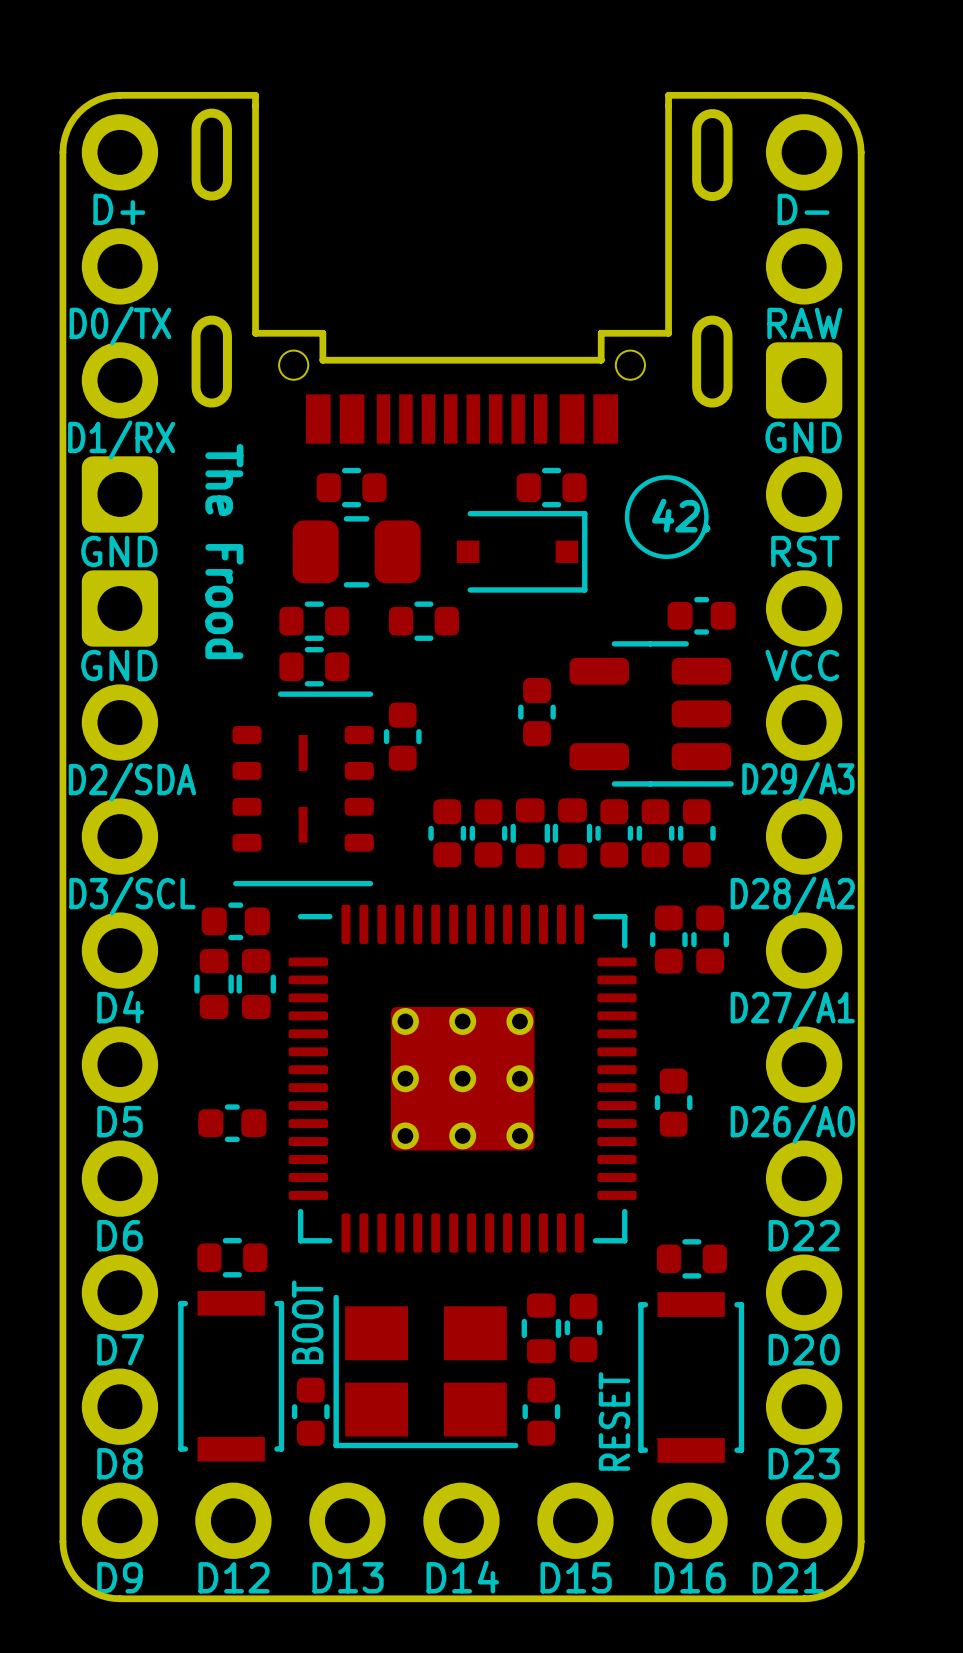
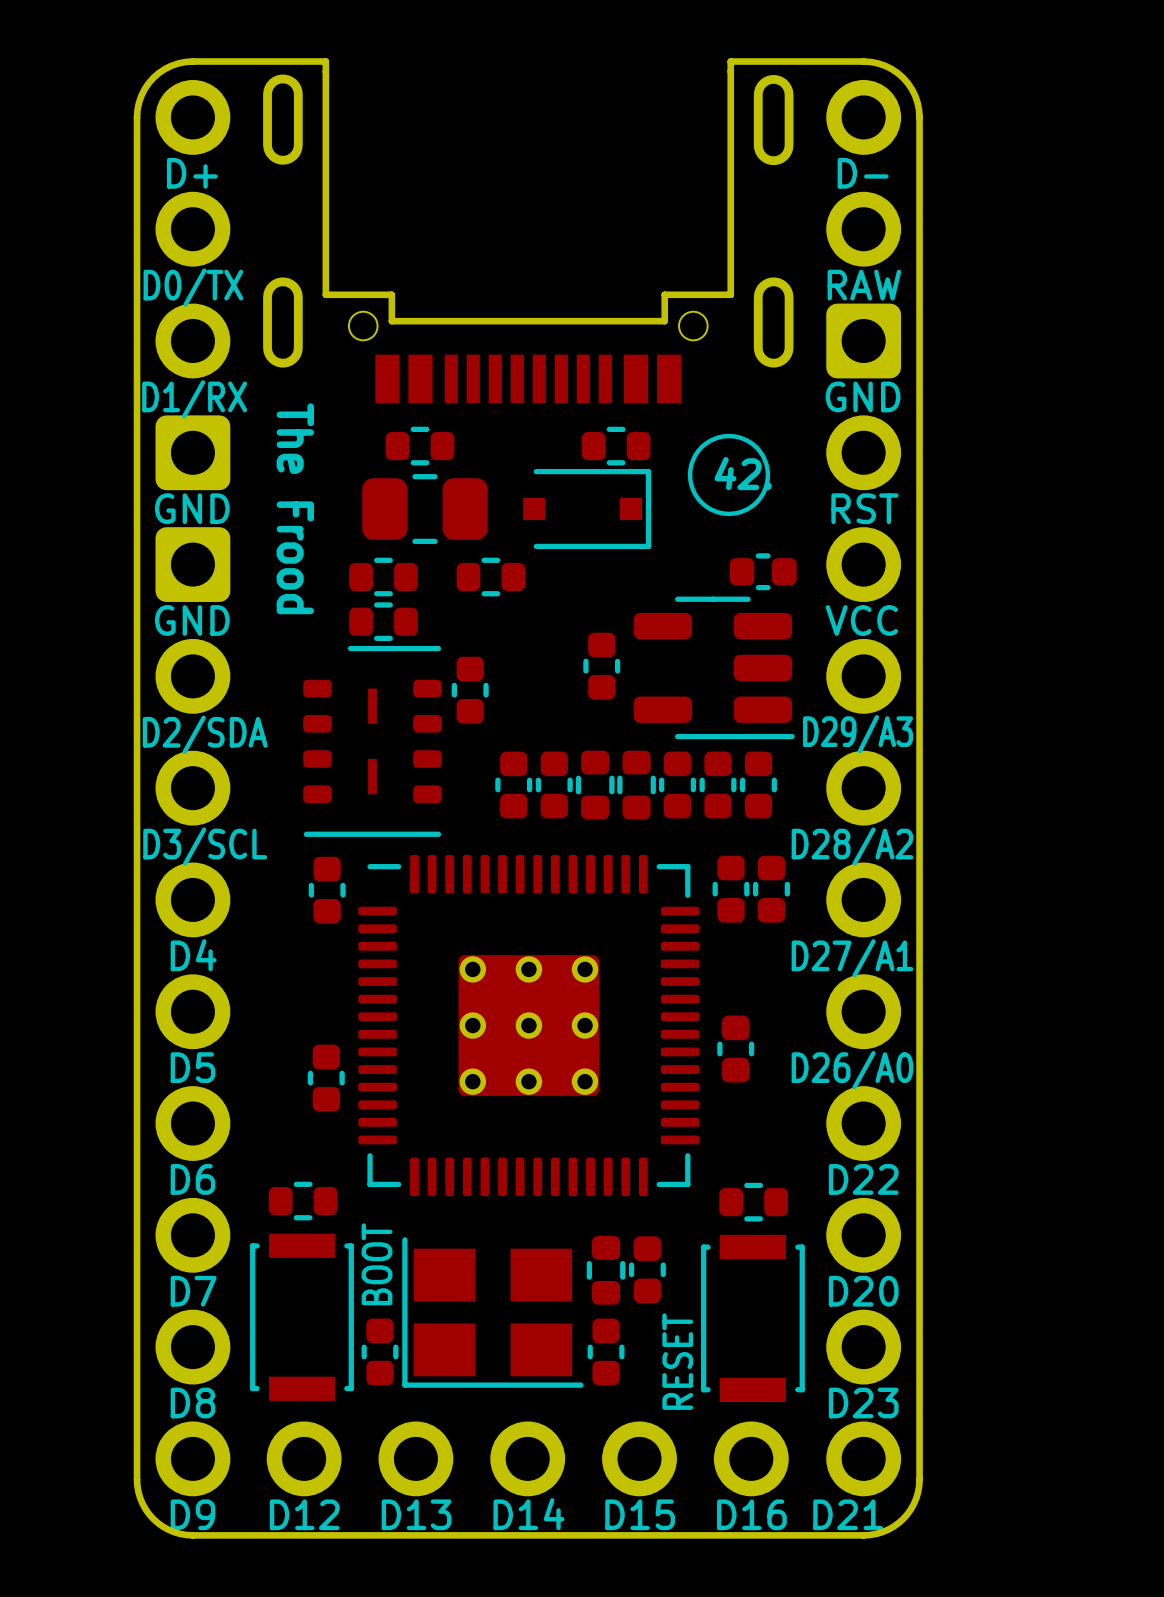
part rotation: 0° (235, 921) -> 90° clockwise (327, 890)
part: (214, 984) -> none
part: (256, 984) -> none
part rotation: 0° (232, 1123) -> 90° clockwise (326, 1078)

